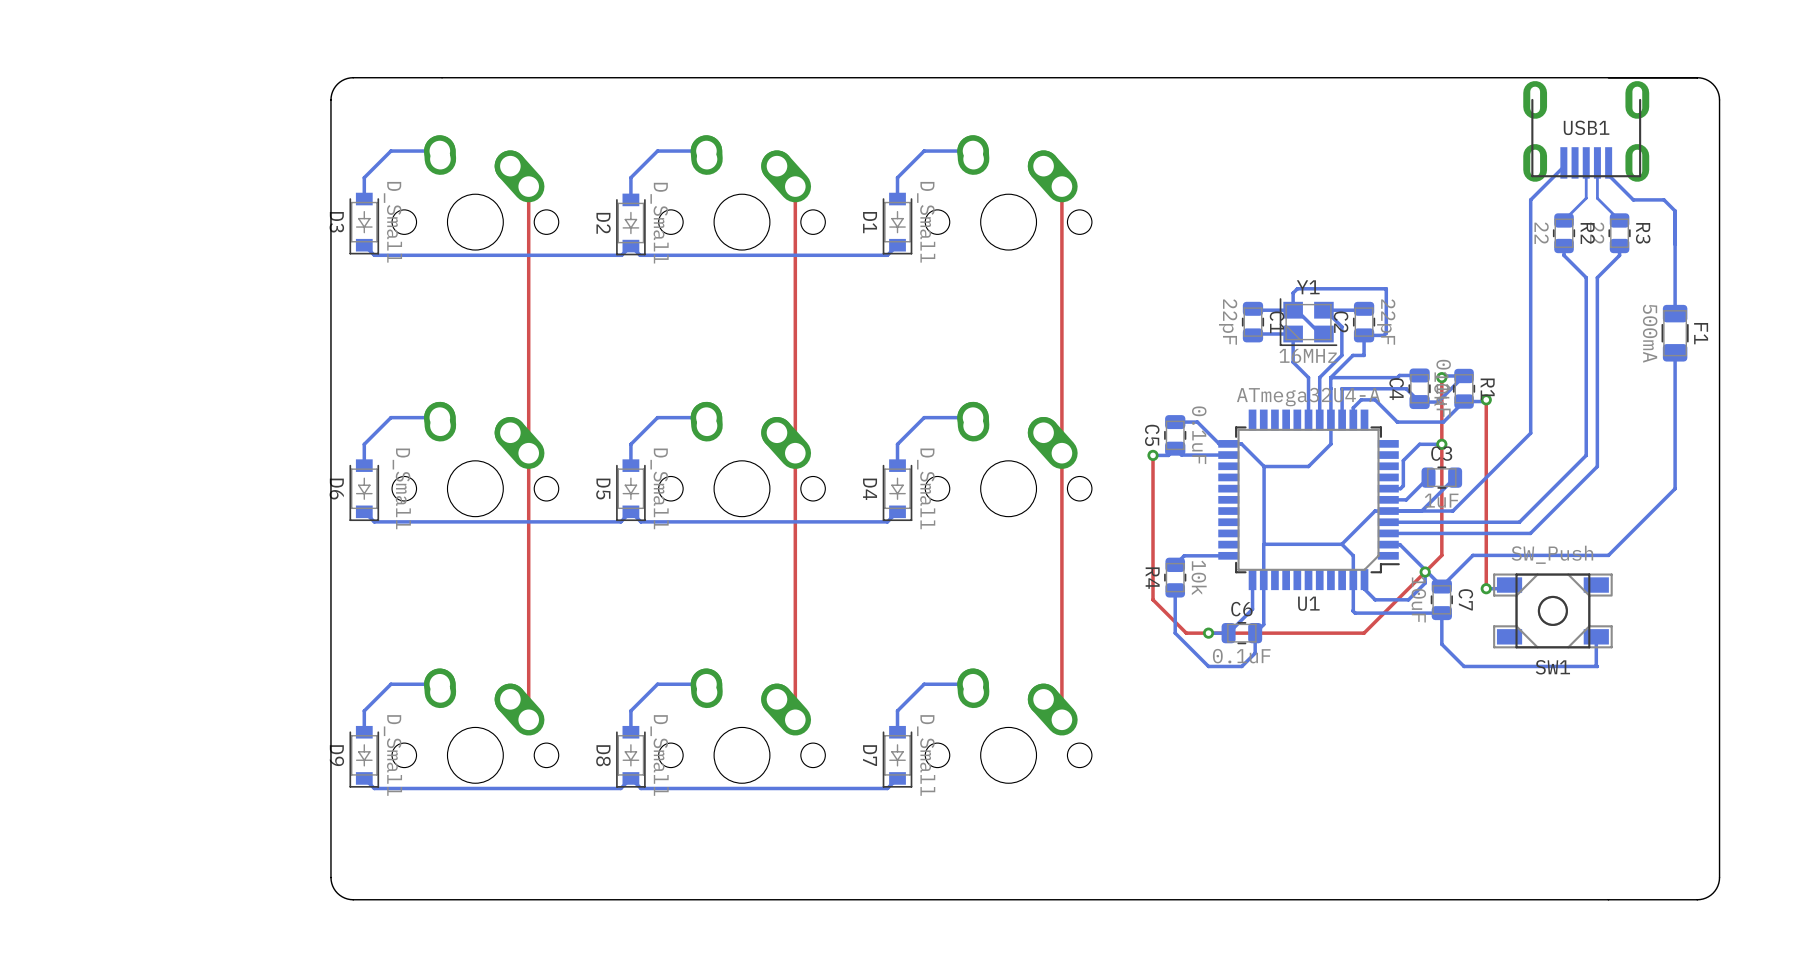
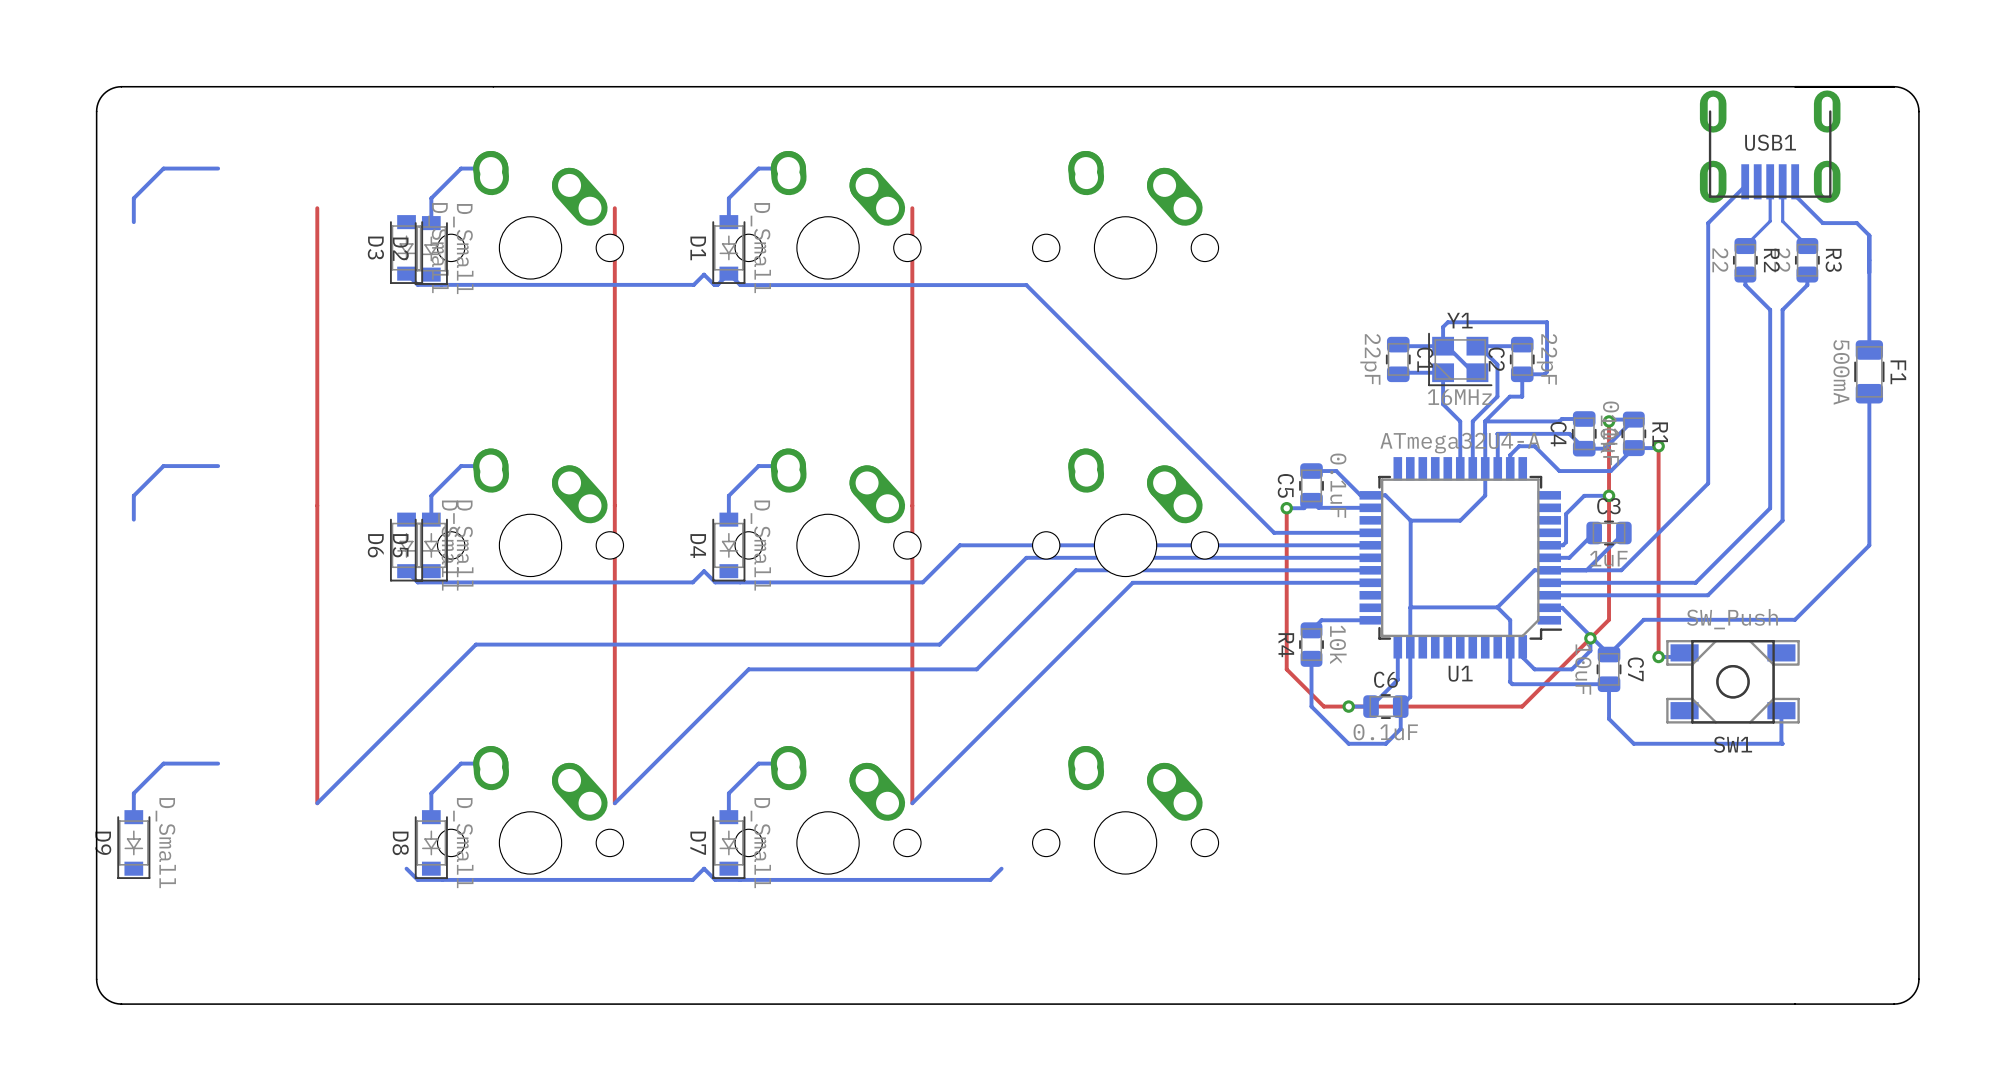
board edge: (353, 77) (344, 79) (337, 84) (332, 91) (330, 99) (330, 877) (332, 886) (337, 893) (344, 898) (353, 899) -> (394, 86) (118, 86) (108, 90) (102, 96) (96, 111) (97, 985) (106, 998) (121, 1004) (394, 1004)
bottom track: none -> (218, 168) (163, 168) (133, 198) (133, 222)
bottom track: (413, 151) (390, 151) (364, 177) (364, 199) -> (461, 168) (431, 198) (431, 223)
bottom track: (679, 151) (657, 151) (630, 177) (630, 199) -> (758, 168) (728, 198) (728, 222)
bottom track: (973, 151) (924, 151) (897, 177) (897, 199) -> none
top track: (528, 186) (528, 719) -> (317, 208) (317, 803)
top track: (795, 186) (795, 719) -> (614, 208) (614, 803)
top track: (1061, 186) (1061, 719) -> (912, 208) (912, 803)
D1 position: (897, 223) -> (728, 249)
D2 position: (630, 224) -> (431, 250)
bottom track: (897, 245) (887, 255) (643, 255) -> (1371, 532) (1274, 532) (1026, 285) (740, 285) (728, 273) (717, 284)
bottom track: none -> (218, 466) (163, 466) (133, 495) (133, 519)
bottom track: (413, 417) (390, 417) (364, 444) (364, 465) -> (461, 466) (431, 495) (431, 519)
bottom track: (679, 417) (657, 417) (630, 444) (630, 465) -> (758, 466) (728, 495) (728, 519)
bottom track: (973, 417) (924, 417) (897, 444) (897, 465) -> none
D5 position: (630, 490) -> (431, 547)
D4 position: (897, 490) -> (728, 547)
bottom track: none -> (1371, 557) (1026, 557) (939, 644) (475, 644) (317, 803)
bottom track: (897, 511) (887, 521) (826, 521) -> (1371, 545) (959, 545) (922, 582)
bottom track: none -> (1371, 570) (1075, 570) (976, 669) (748, 669) (614, 803)
bottom track: none -> (1371, 582) (1132, 582) (912, 803)
bottom track: none -> (218, 763) (163, 763) (133, 793) (133, 817)
bottom track: (413, 684) (390, 684) (364, 710) (364, 732) -> (461, 763) (431, 793) (431, 817)
bottom track: (679, 684) (657, 684) (630, 710) (630, 732) -> (758, 763) (728, 793) (728, 817)
bottom track: (973, 684) (924, 684) (897, 710) (897, 732) -> none
D9 position: (364, 756) -> (133, 844)
D8 position: (630, 756) -> (431, 844)
D7 position: (897, 756) -> (728, 844)

